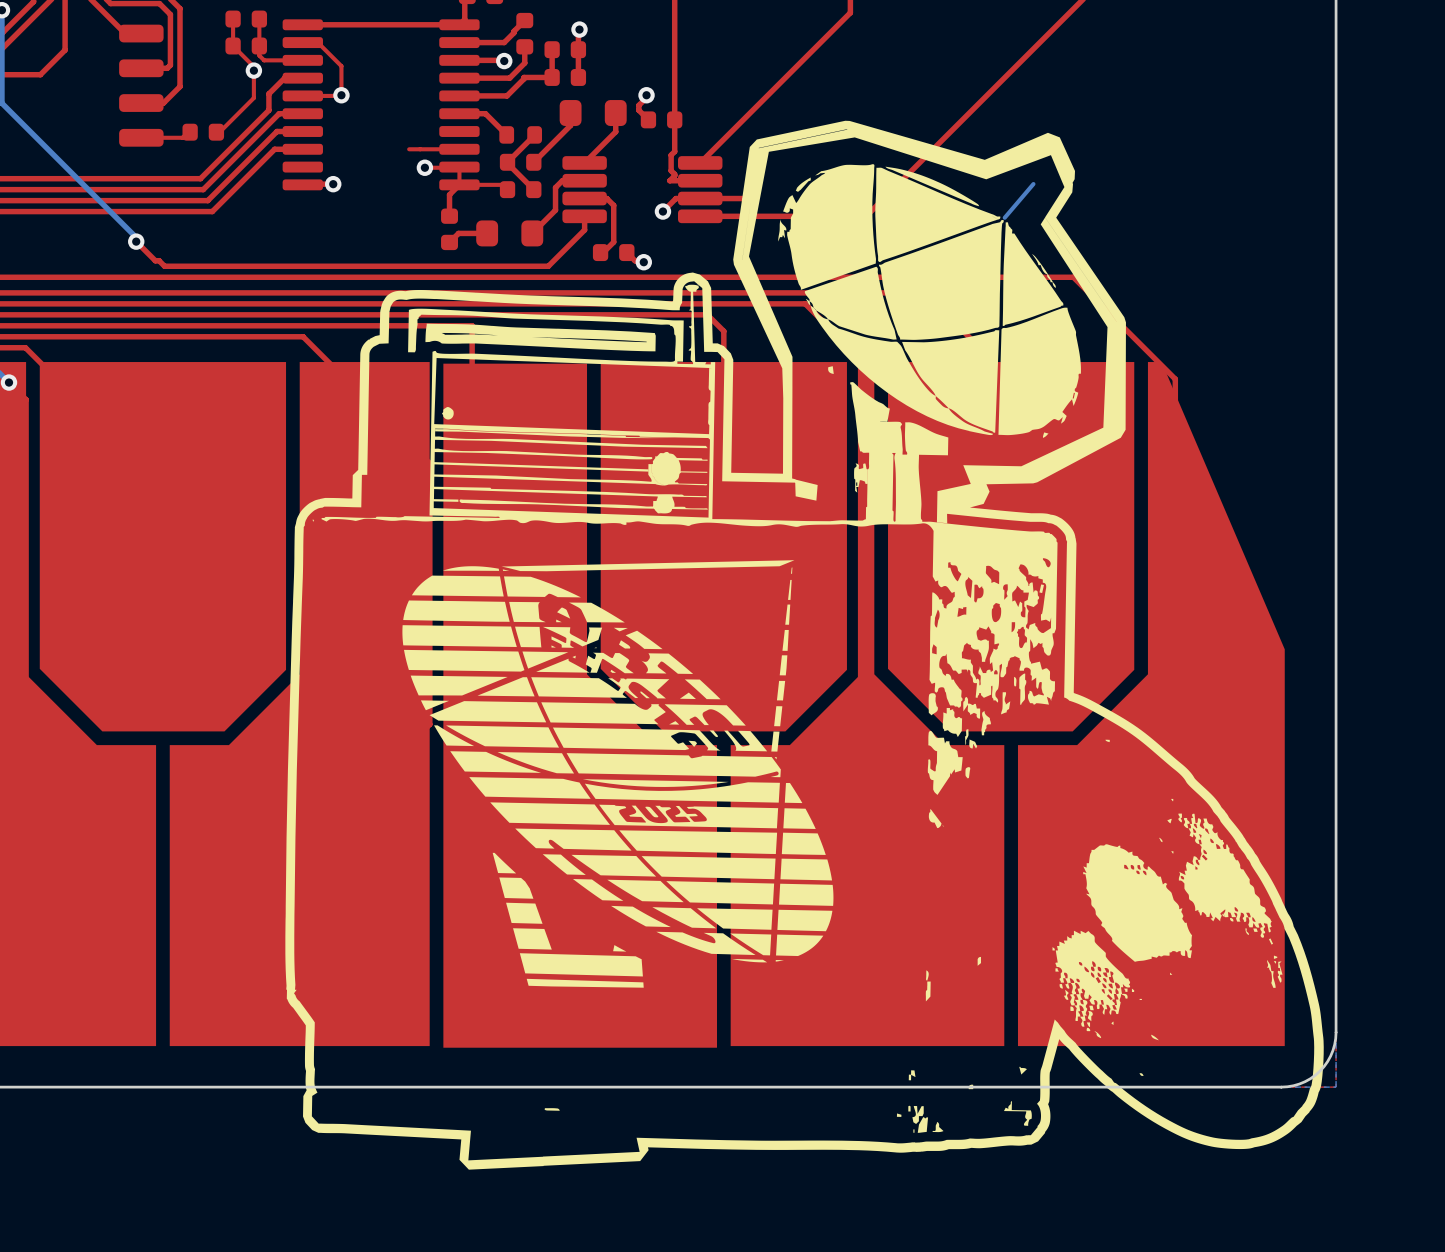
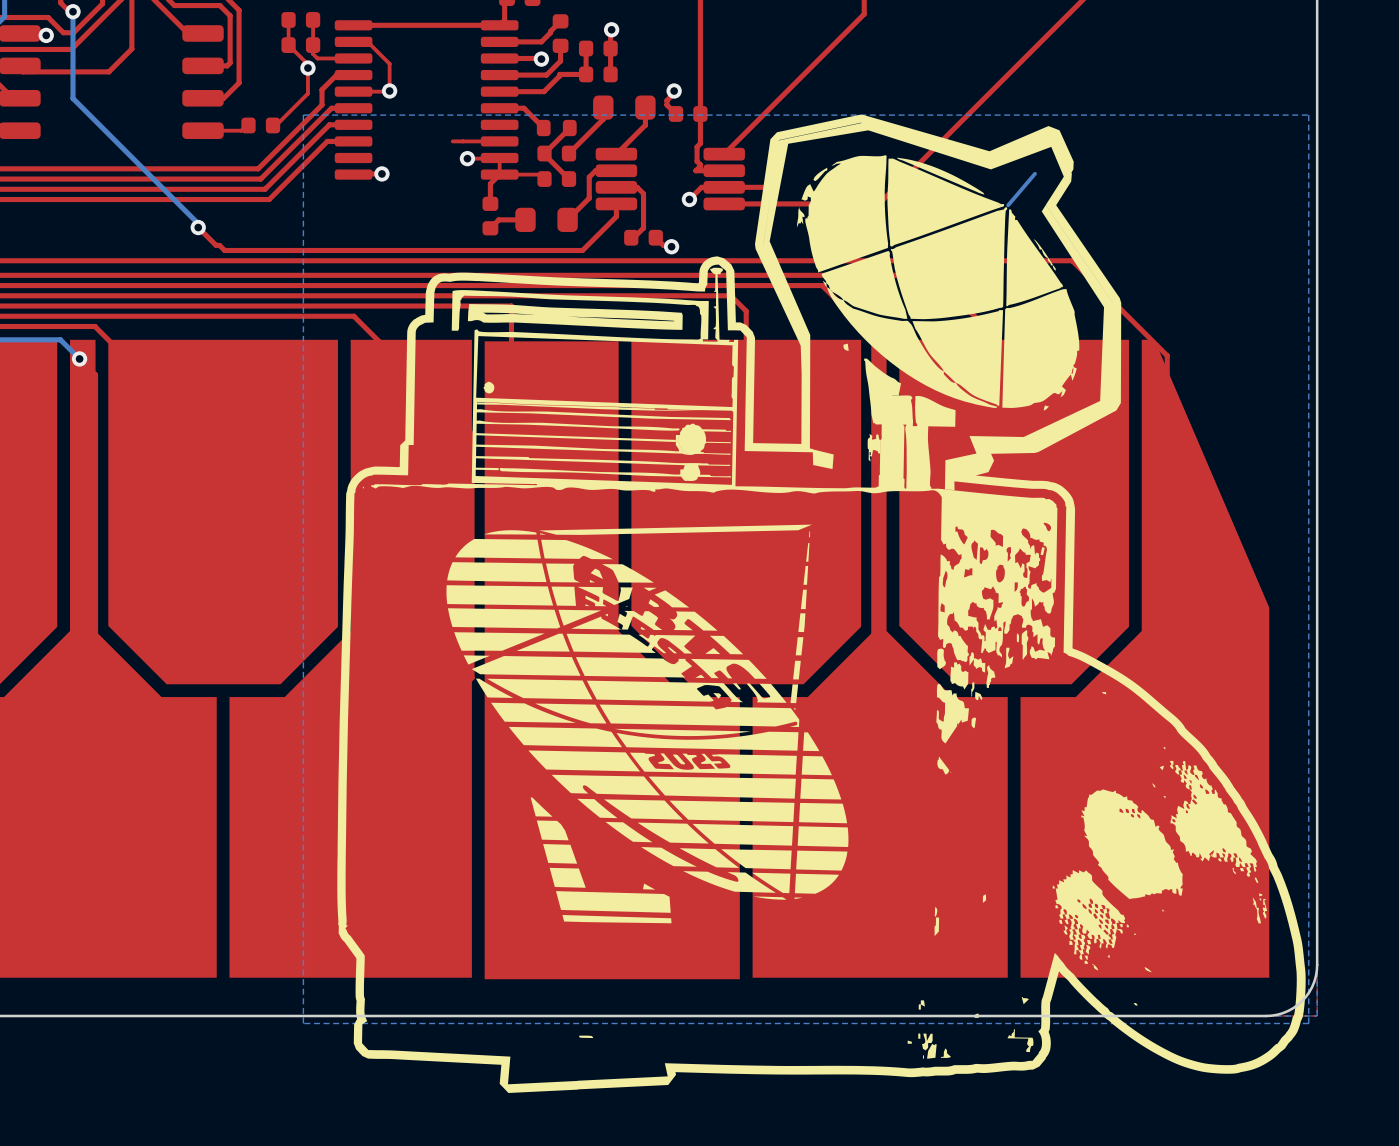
bottom zone outline: none -> (1308, 115) (303, 115) (303, 1023) (1308, 1023) (1308, 115)

